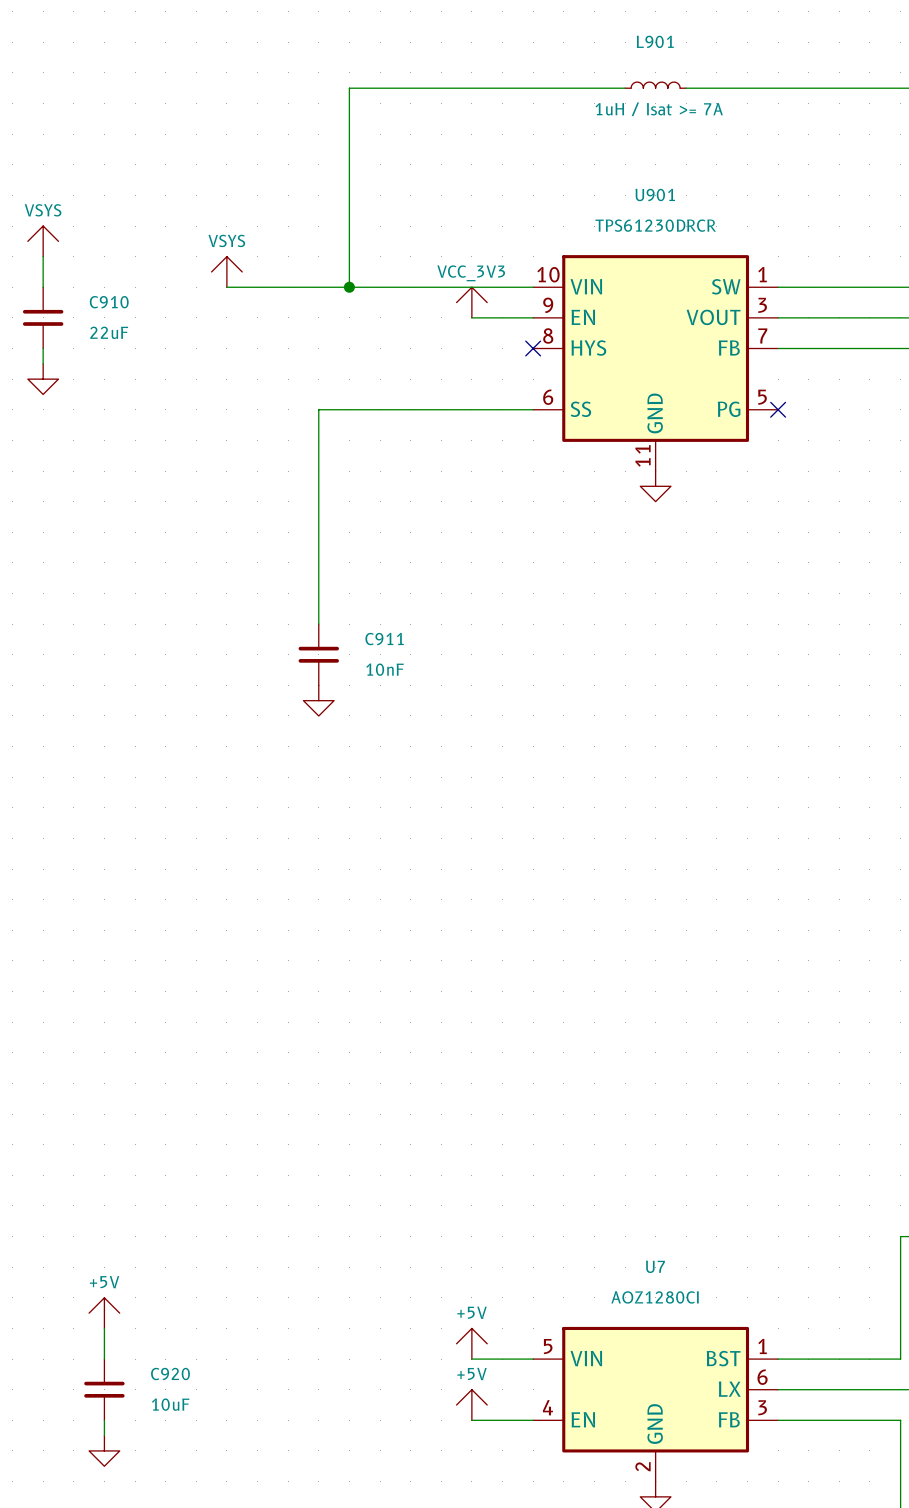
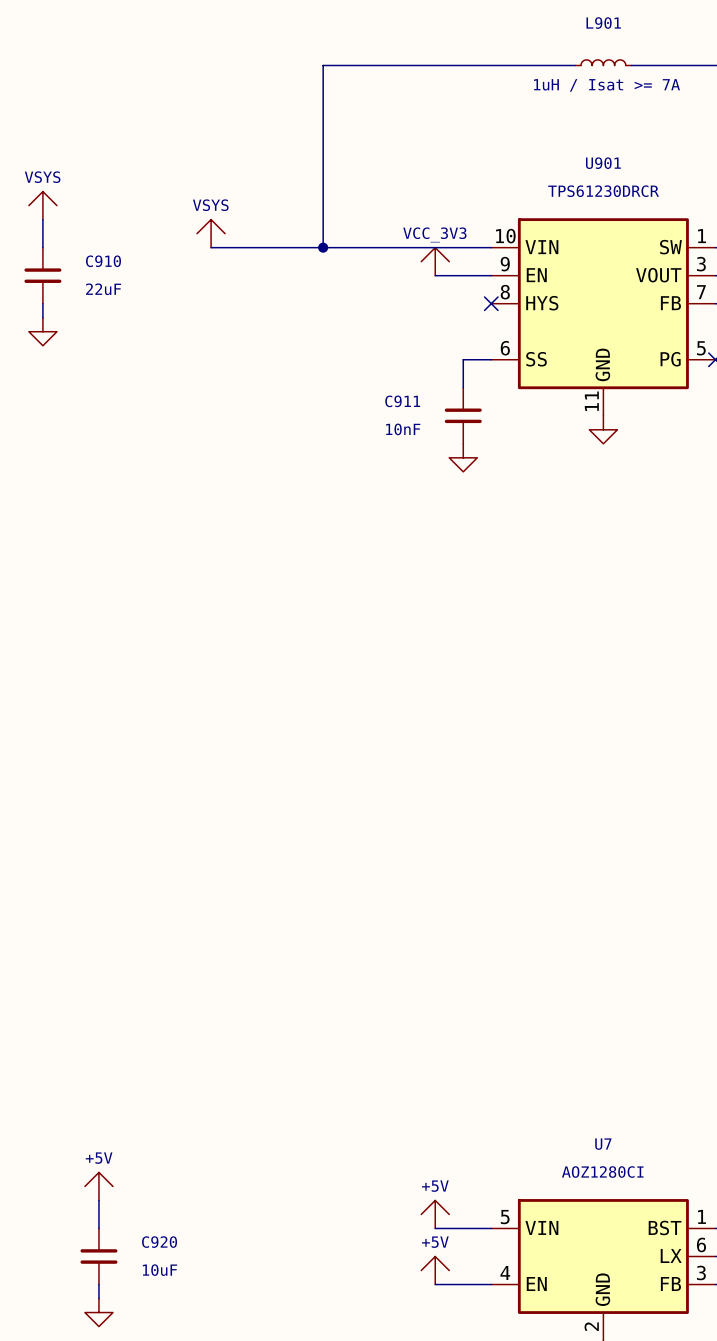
wire: (502, 409) (318, 409) (318, 624) -> (463, 359) (463, 387)
C911 name position: C911 (384, 639) -> C911 (402, 401)
C911 position: (318, 654) -> (463, 415)
C911 value position: 10nF (385, 669) -> 10nF (403, 429)
power symbol position: (318, 700) -> (463, 457)

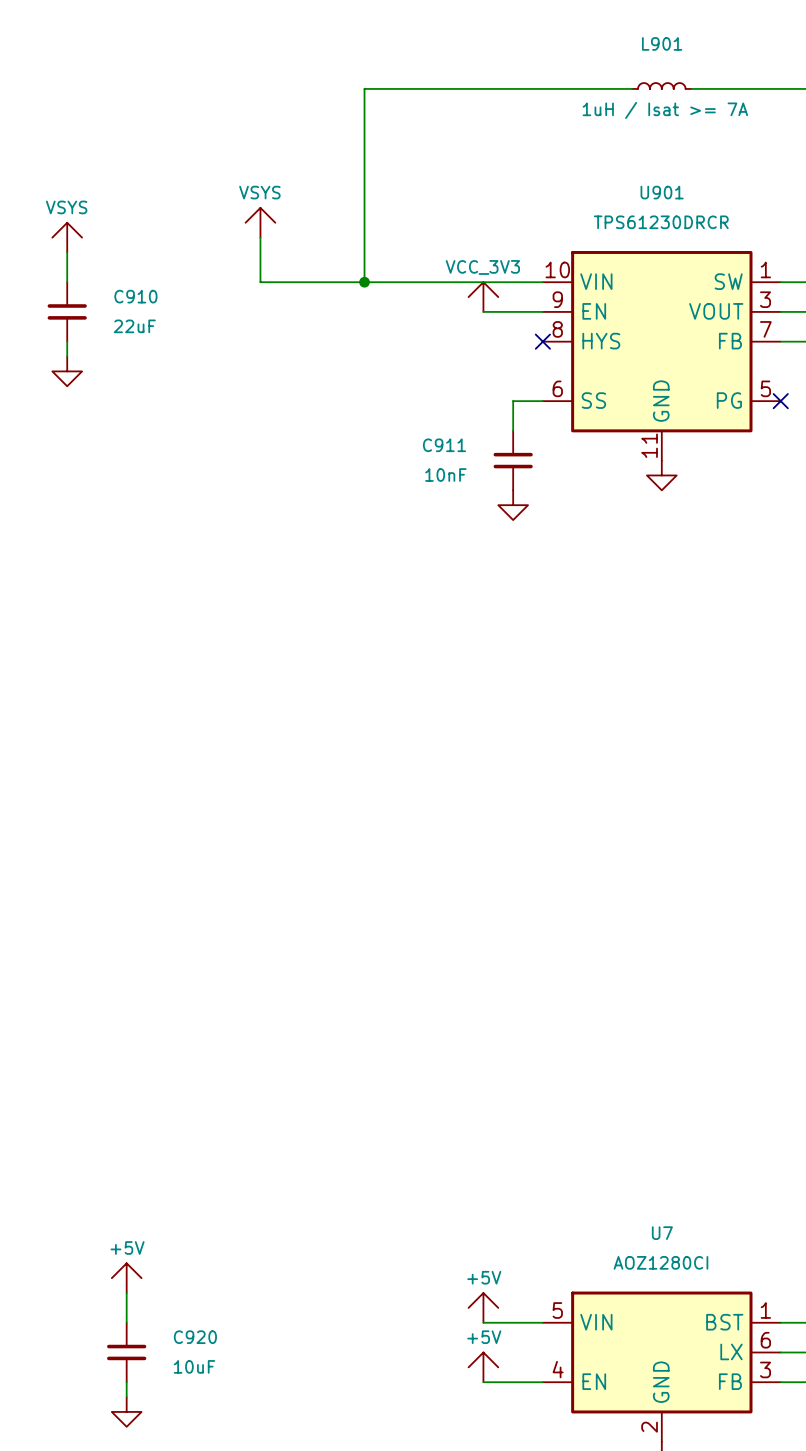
power symbol position: VSYS (211, 233) -> VSYS (260, 222)
wire: (211, 247) (225, 247) -> (260, 237) (260, 282)

